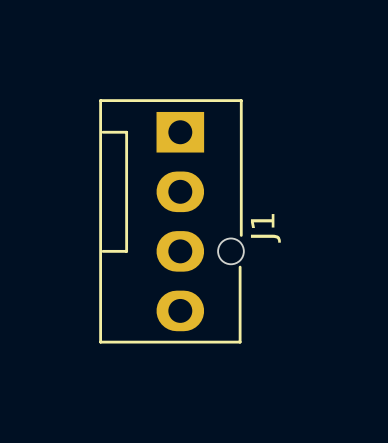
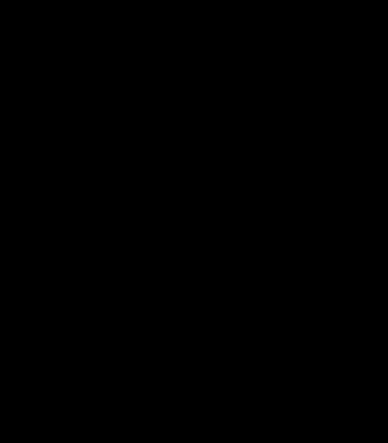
J1: (171, 221) -> none

